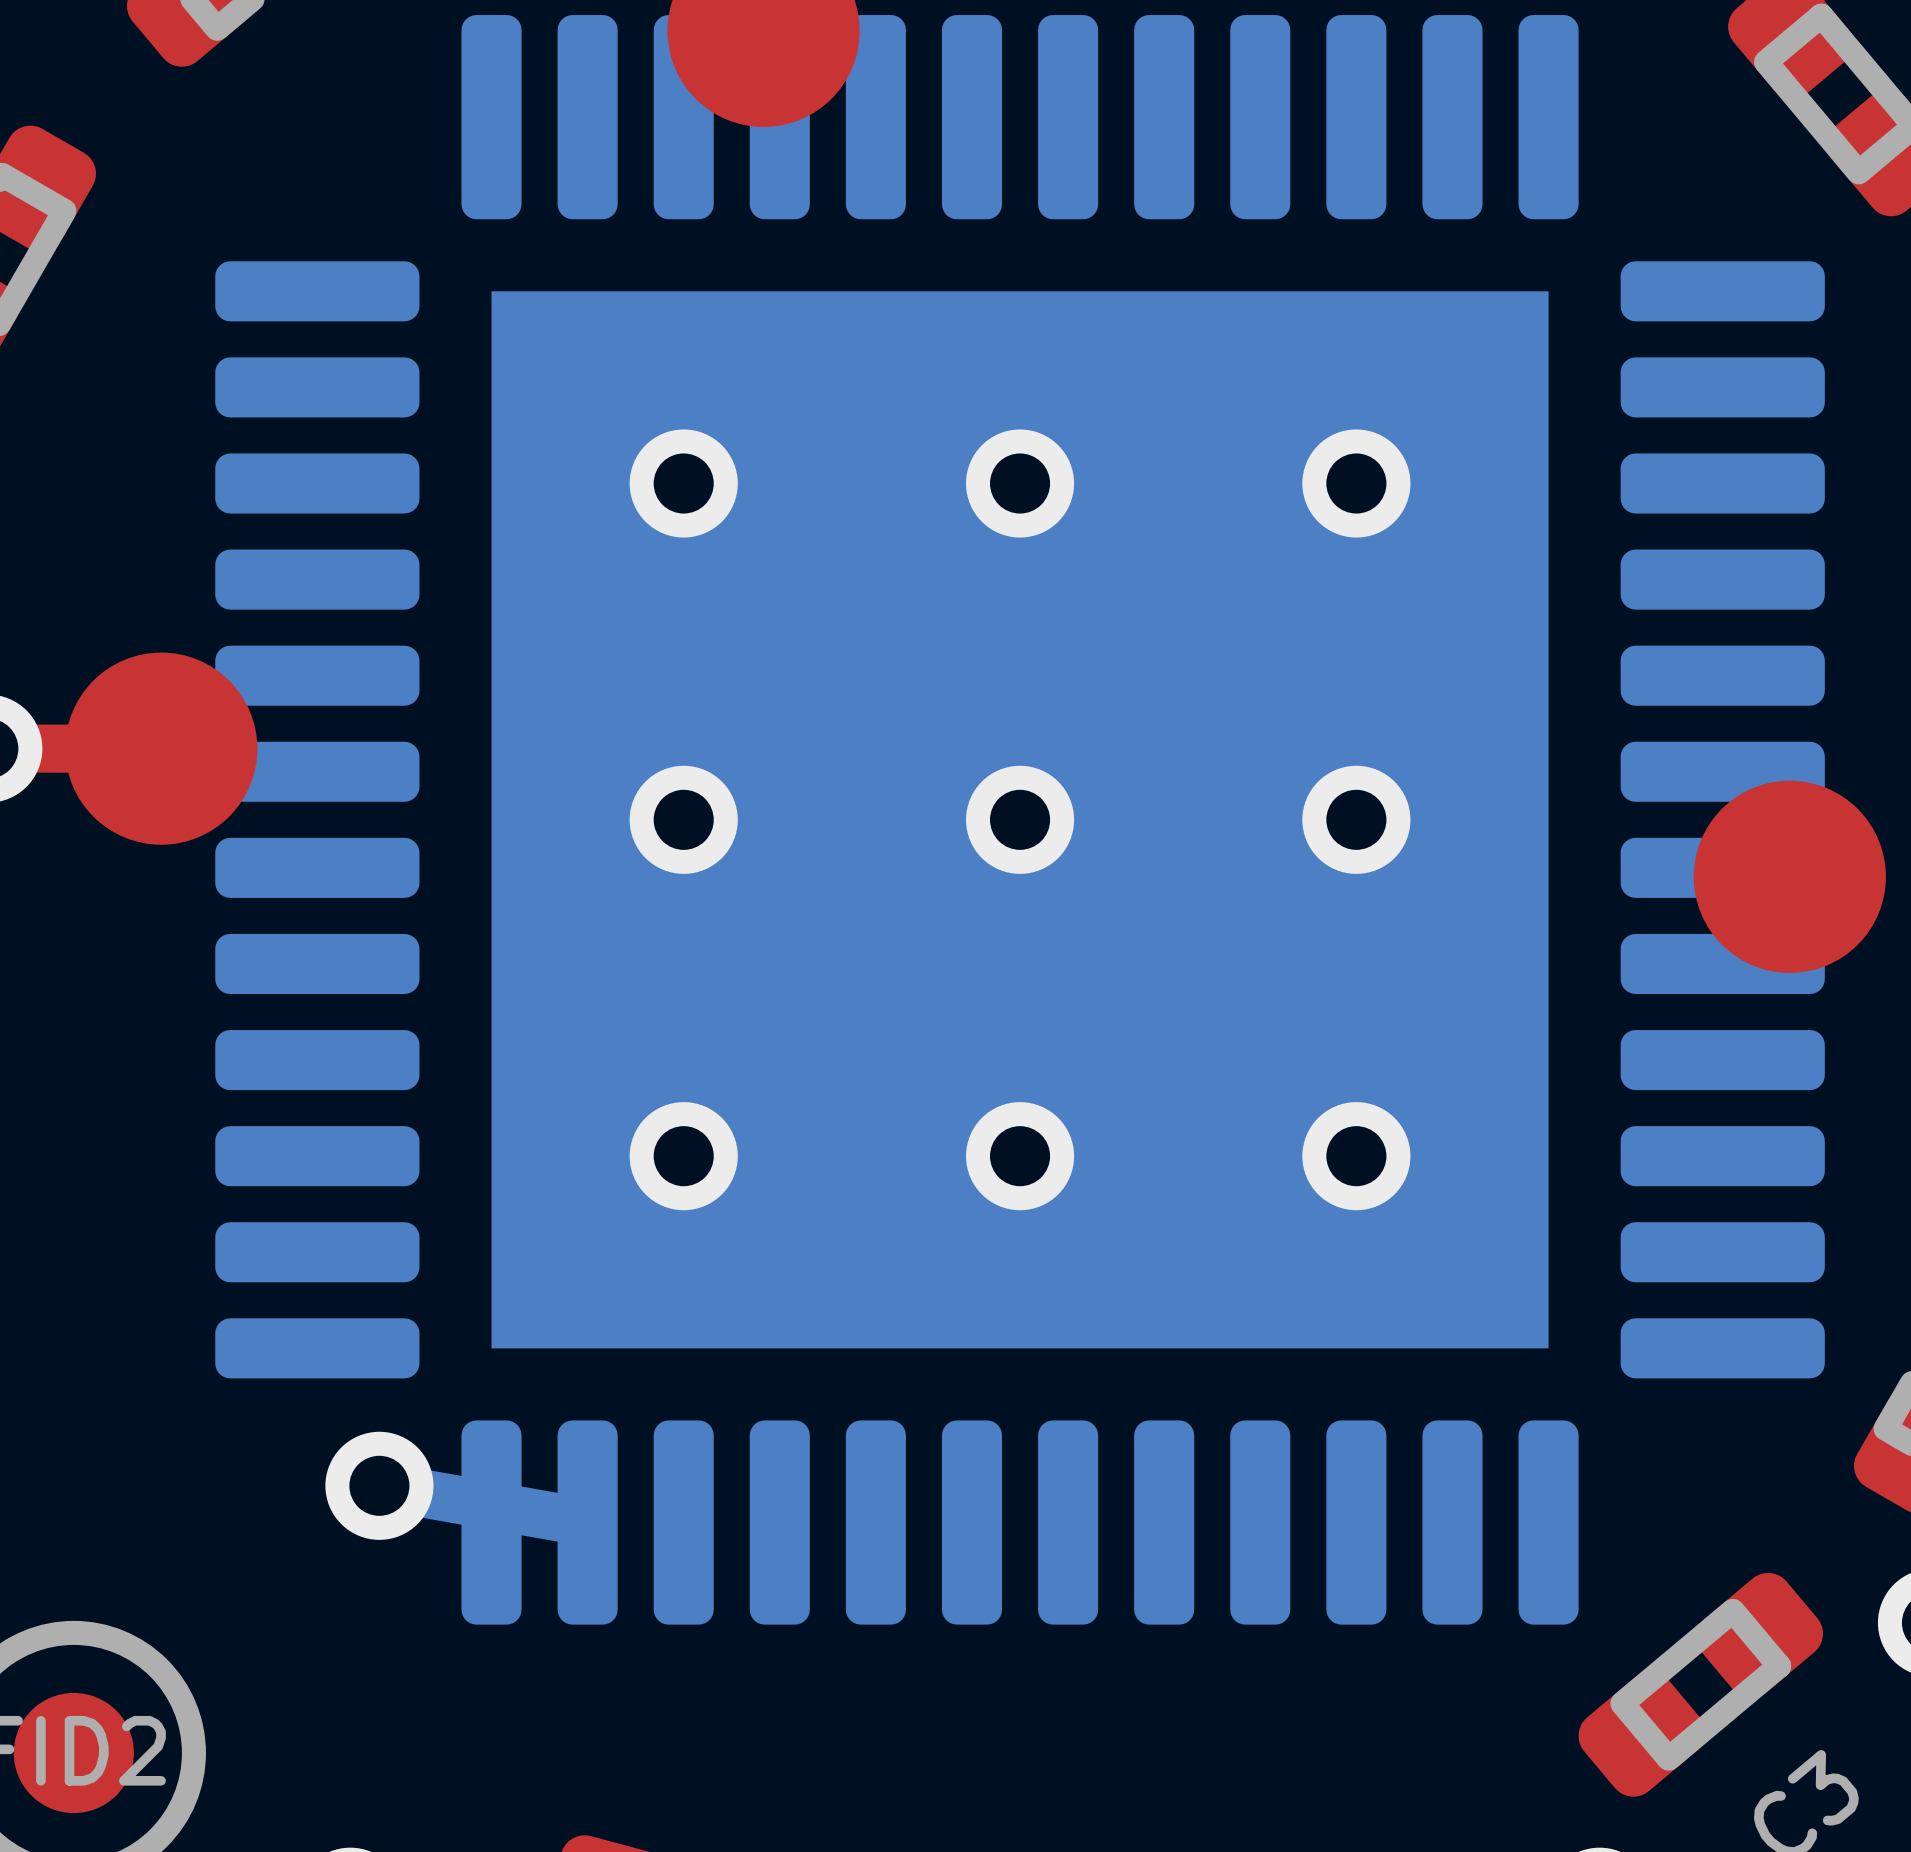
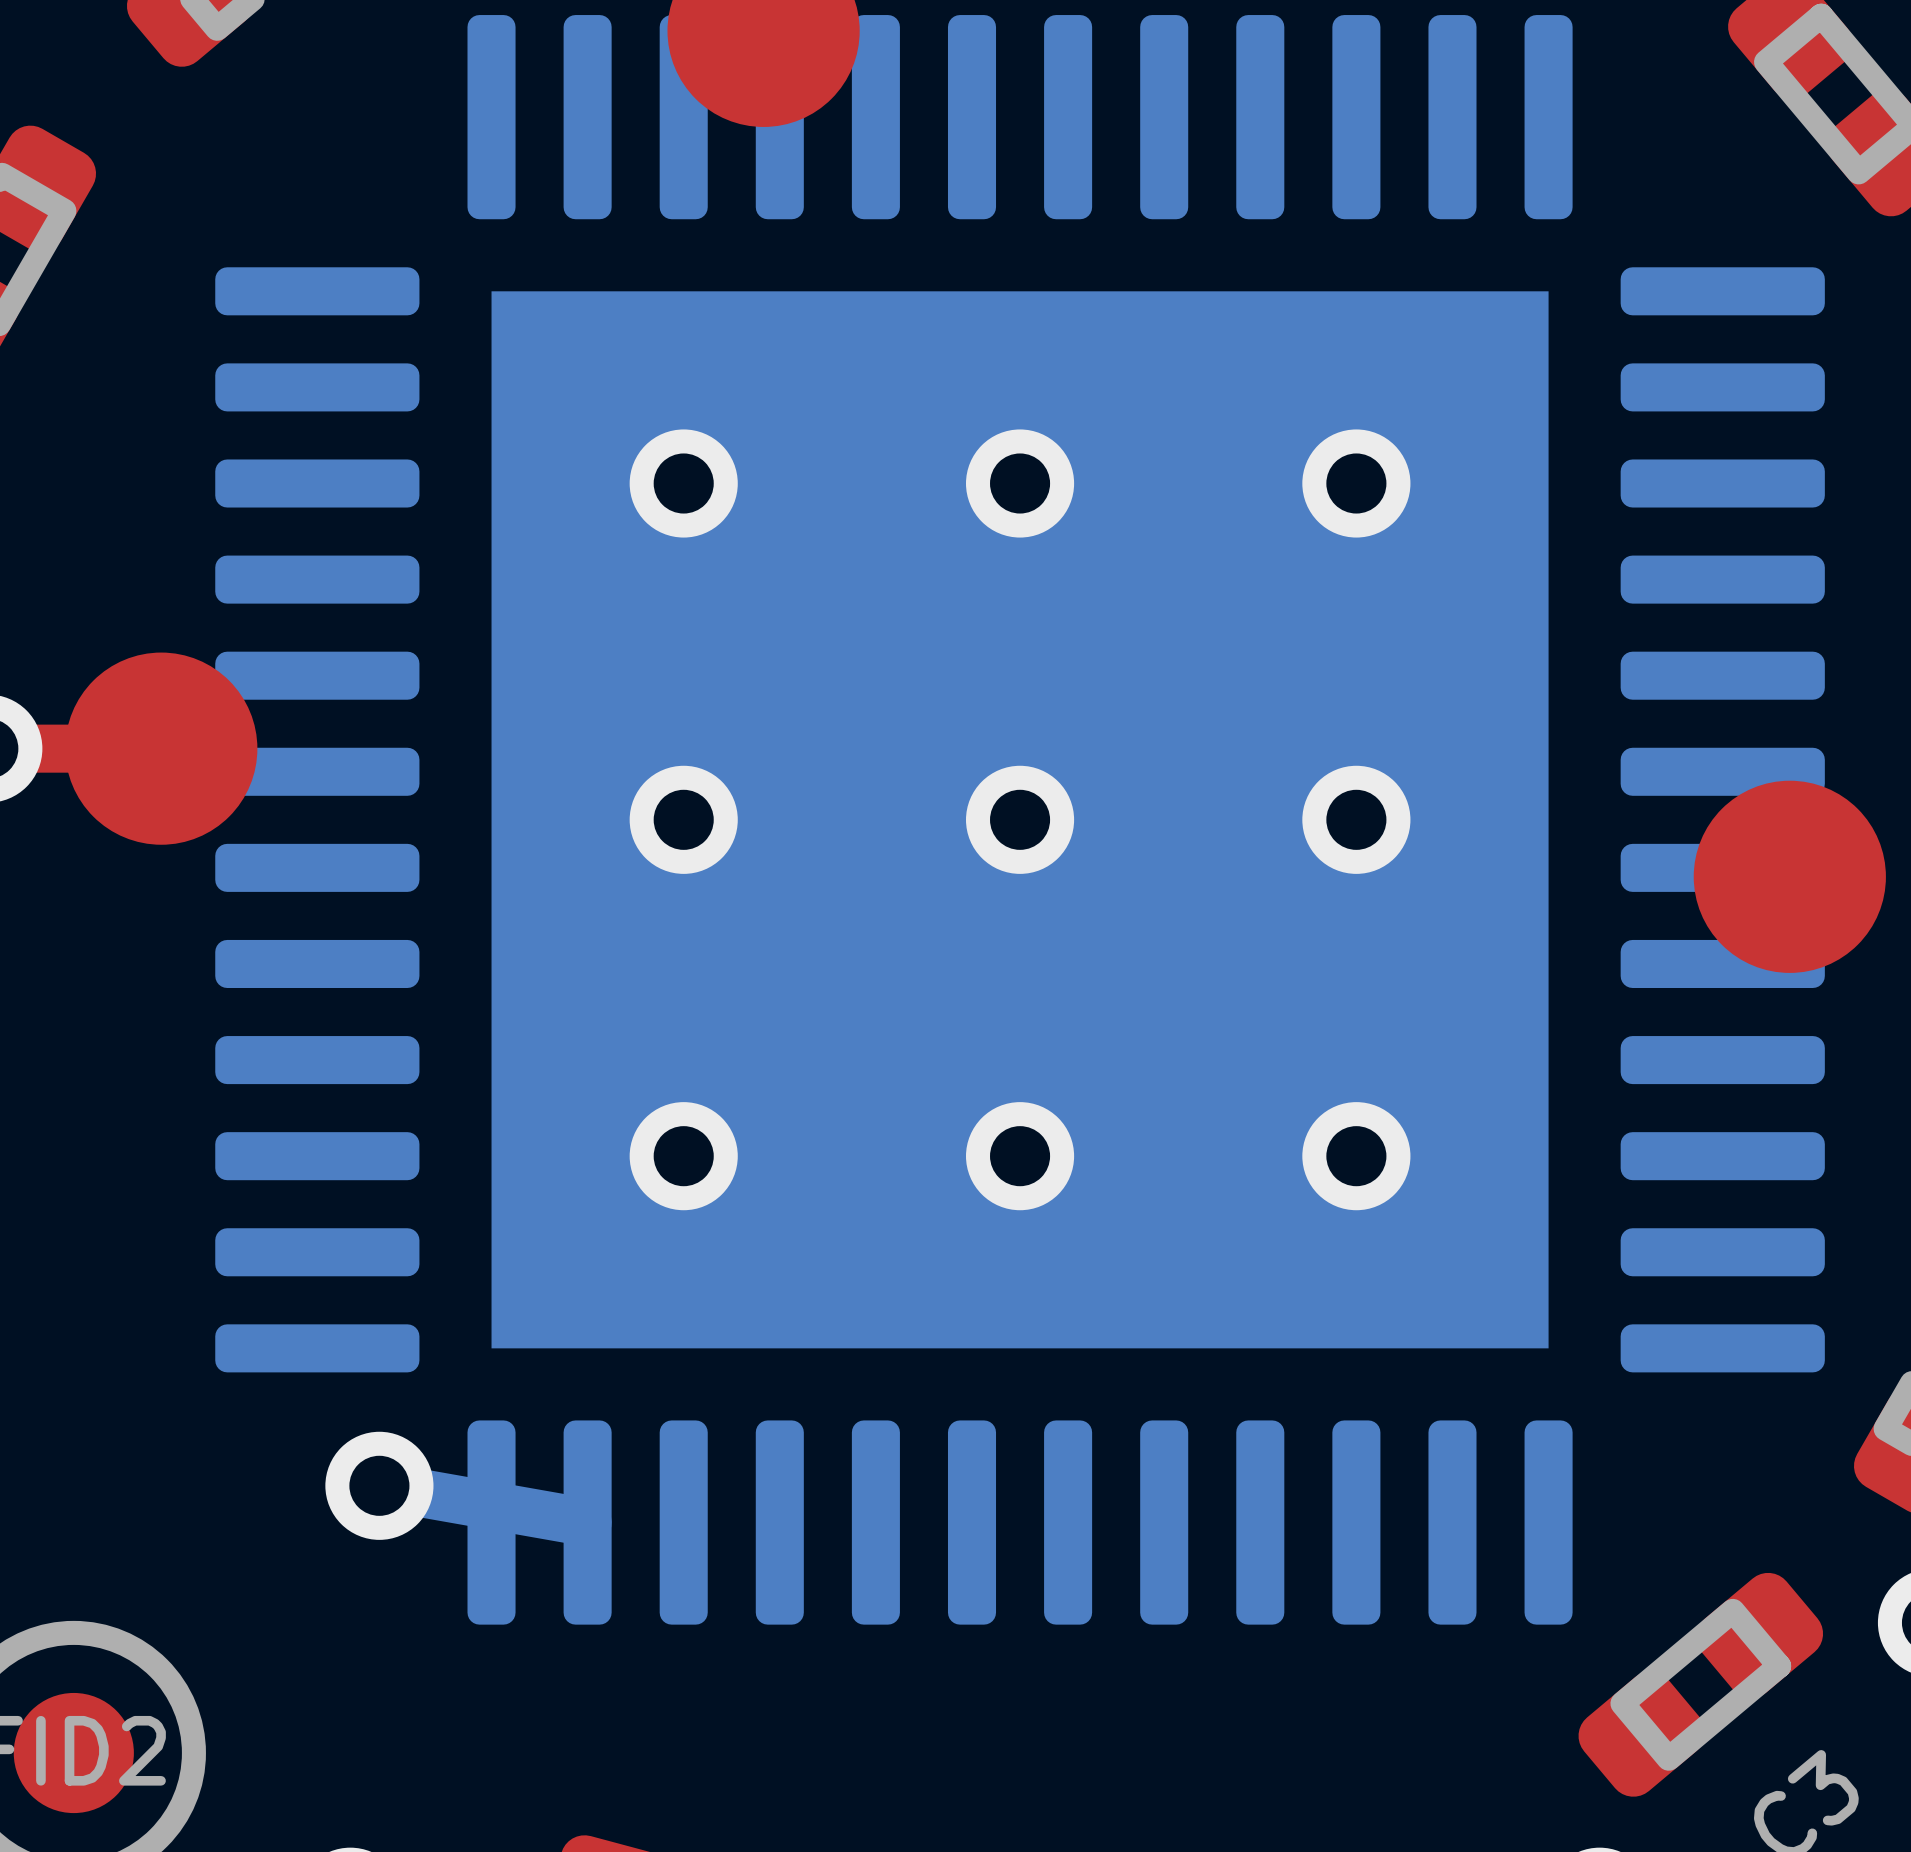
part footprint: [215, 15, 1825, 1625] -> [215, 15, 1825, 1625]

